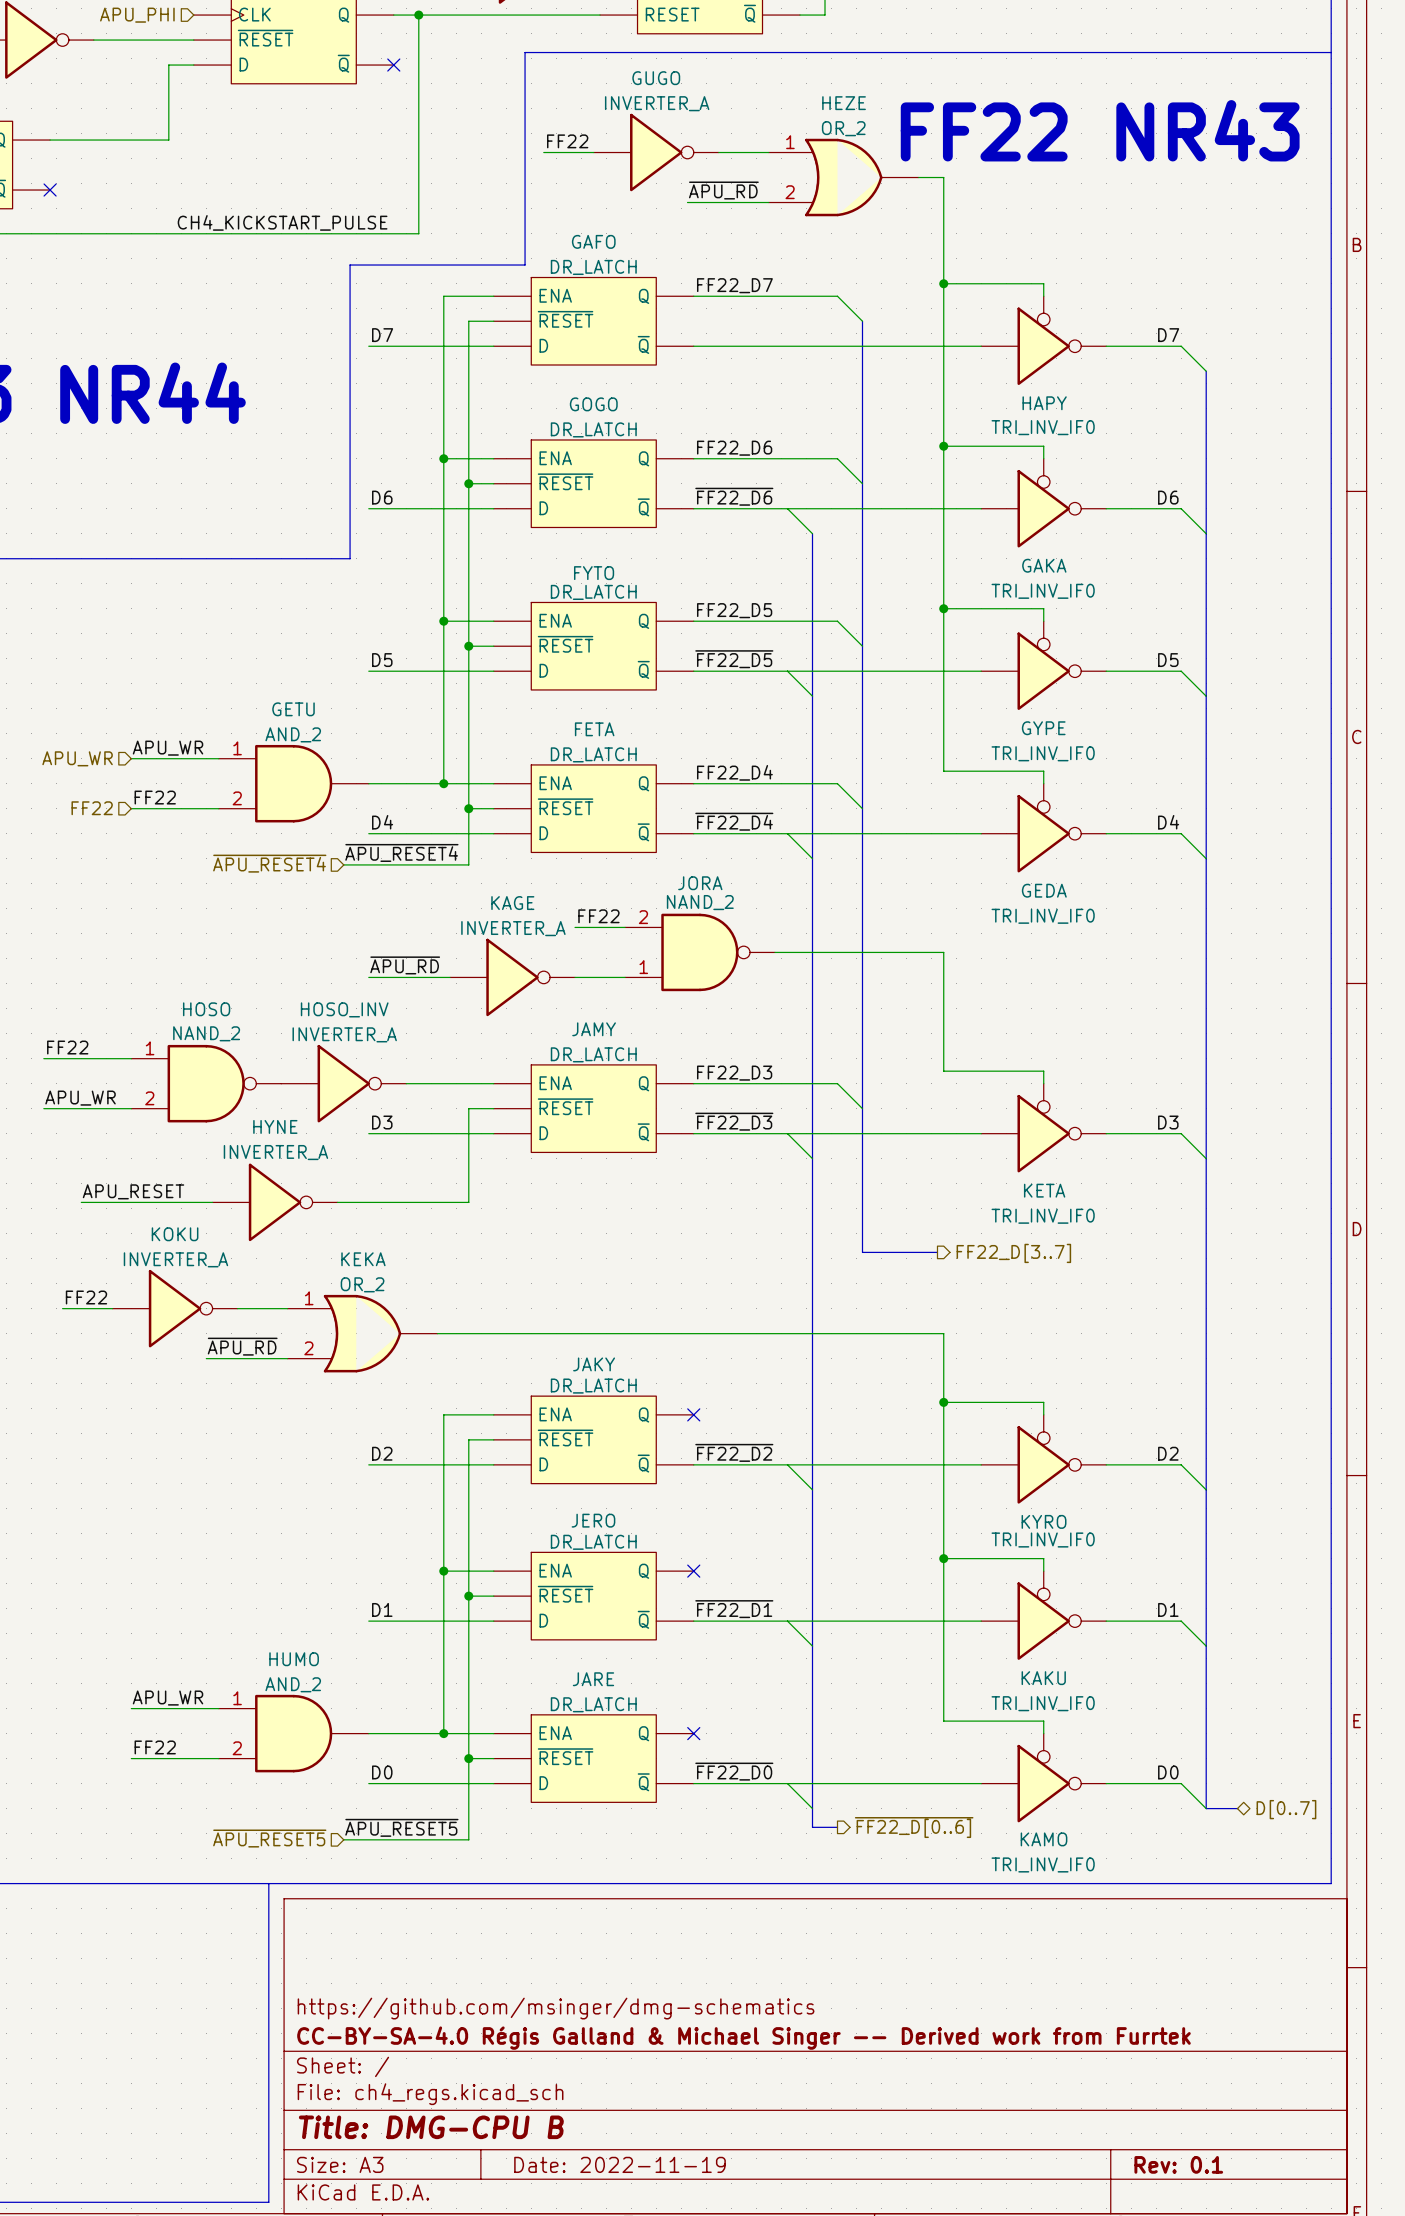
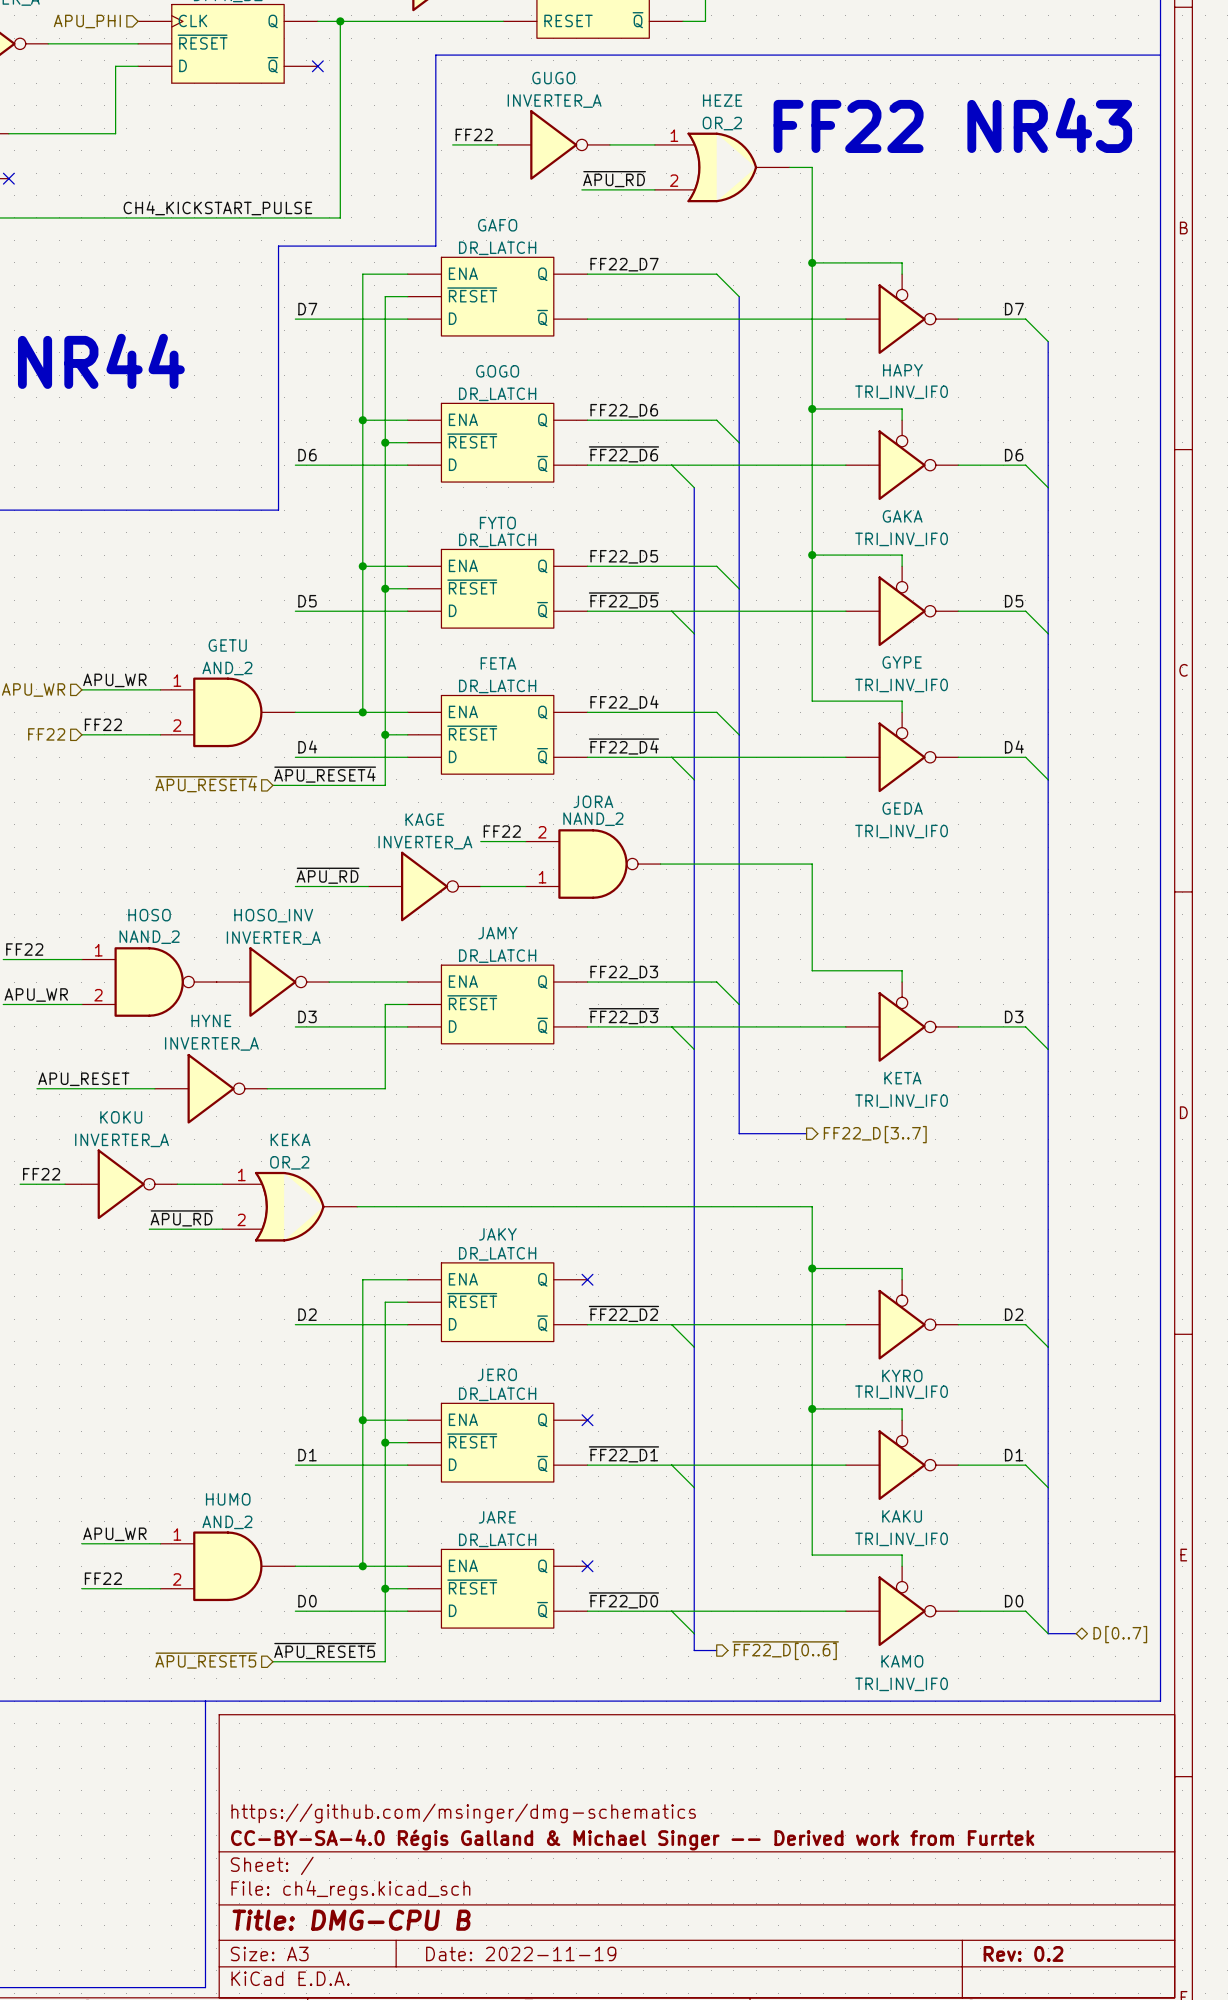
title block: Rev: 0.1 (1178, 2164) -> Rev: 0.2 (1023, 1953)

